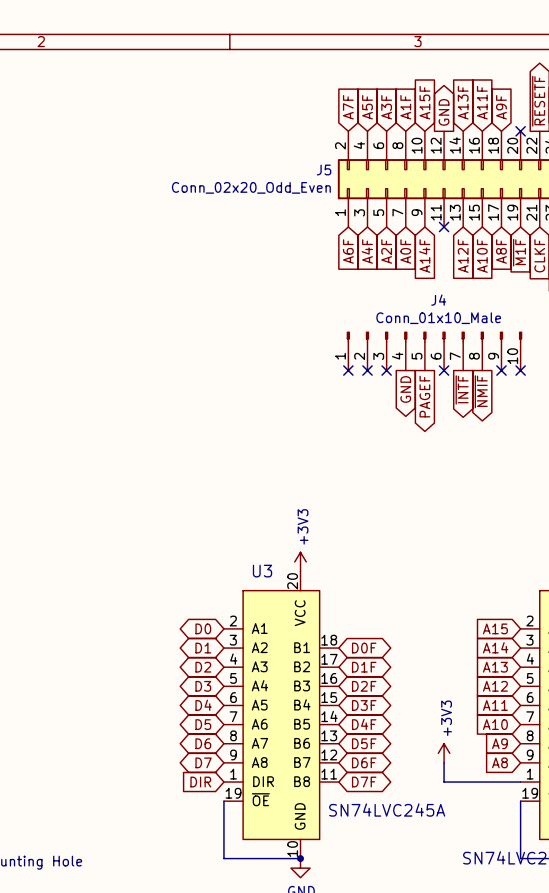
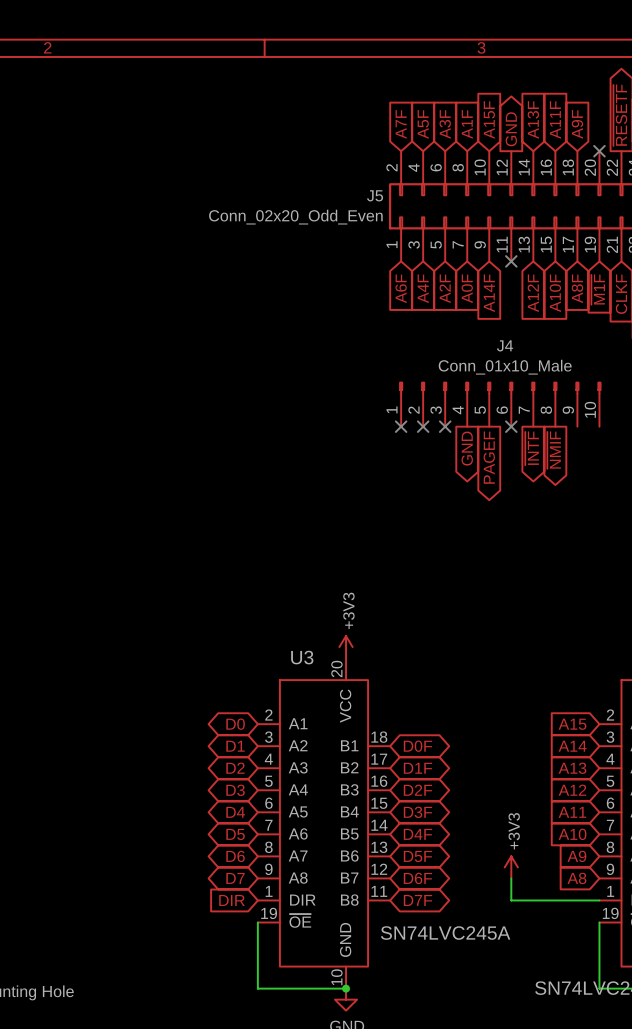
no-connect mark: (501, 370) -> none
no-connect mark: (520, 370) -> none

